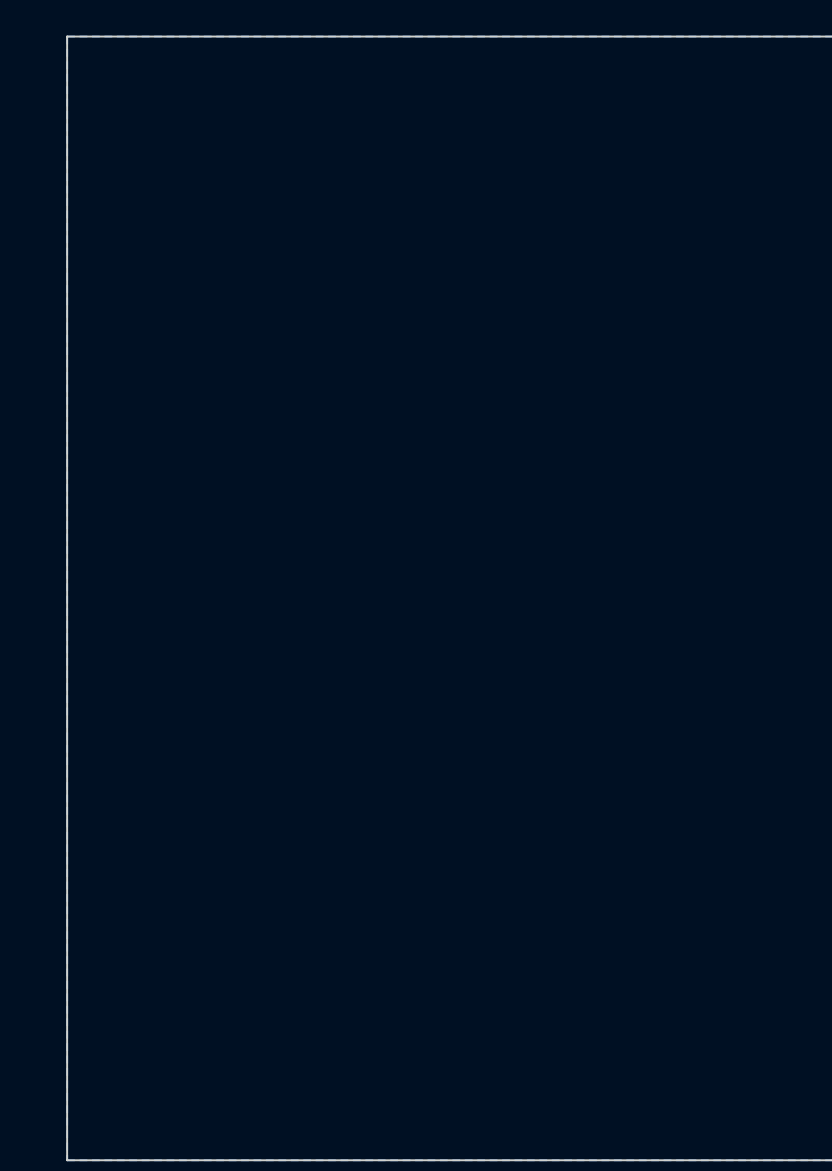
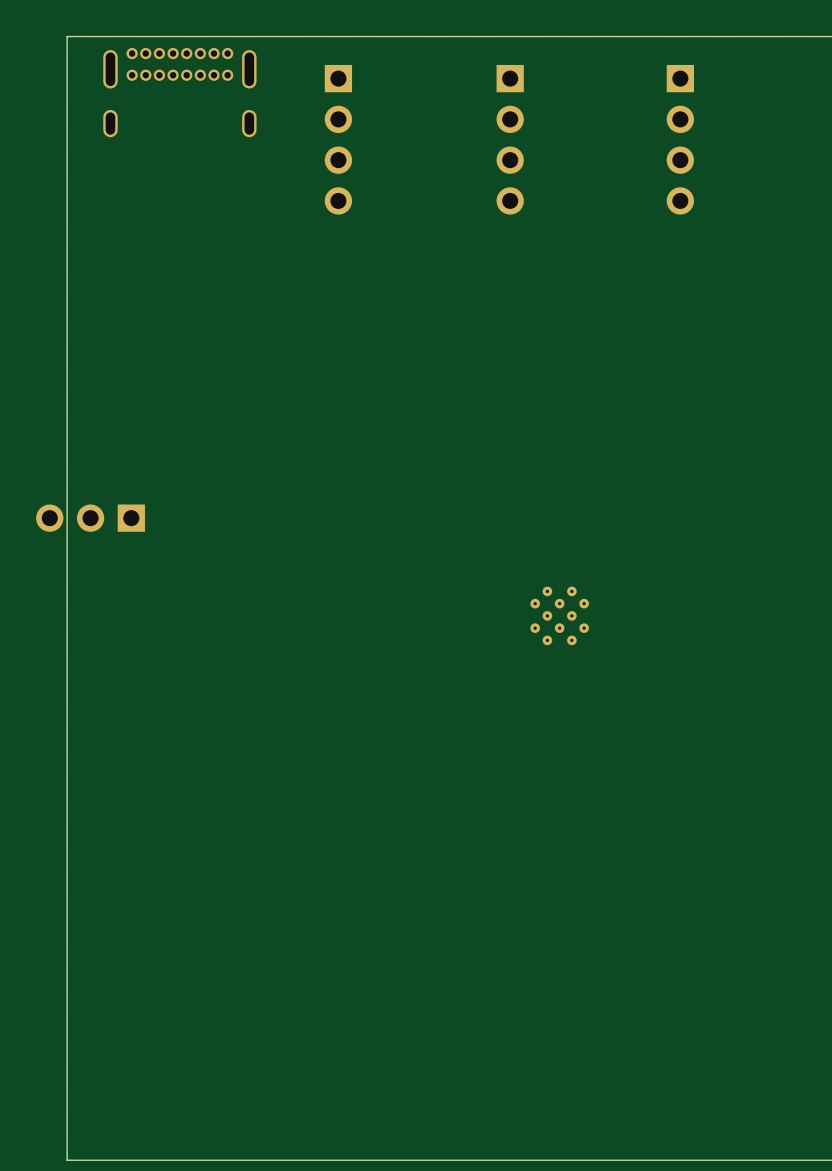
part: none -> (179, 92)
part: none -> (338, 139)
part: none -> (510, 139)
part: none -> (680, 139)
part: none -> (90, 518)
part: none -> (559, 615)

